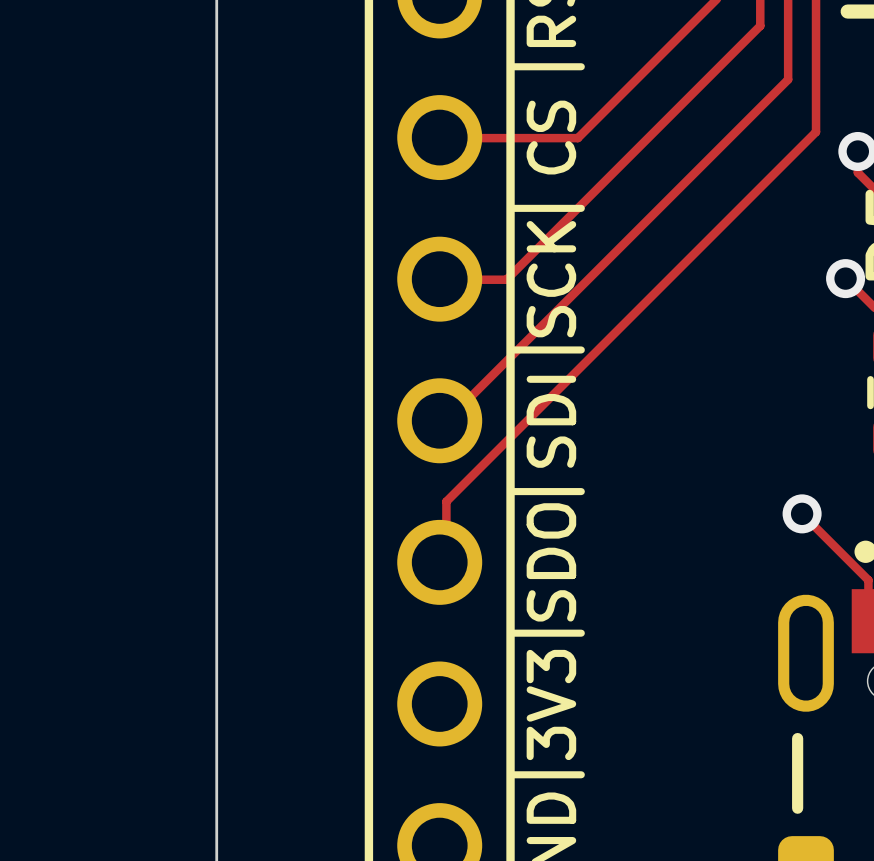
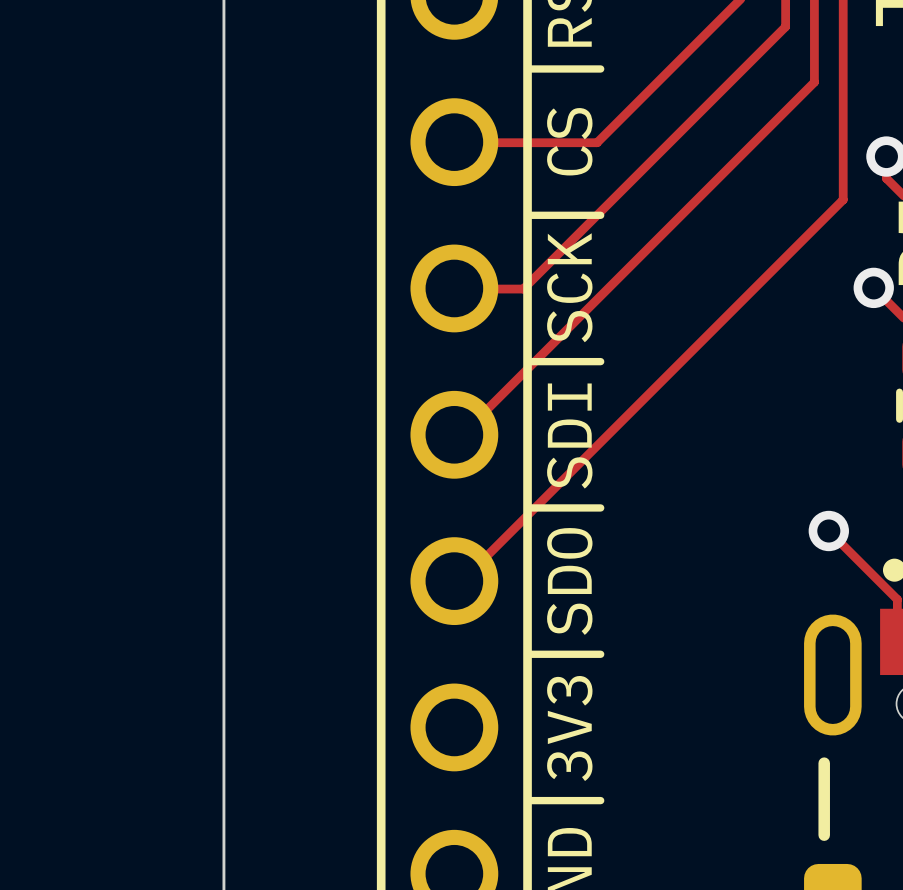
track: (816, 131) (446, 501) (446, 562) -> (843, 136) (843, 199) (461, 581)

